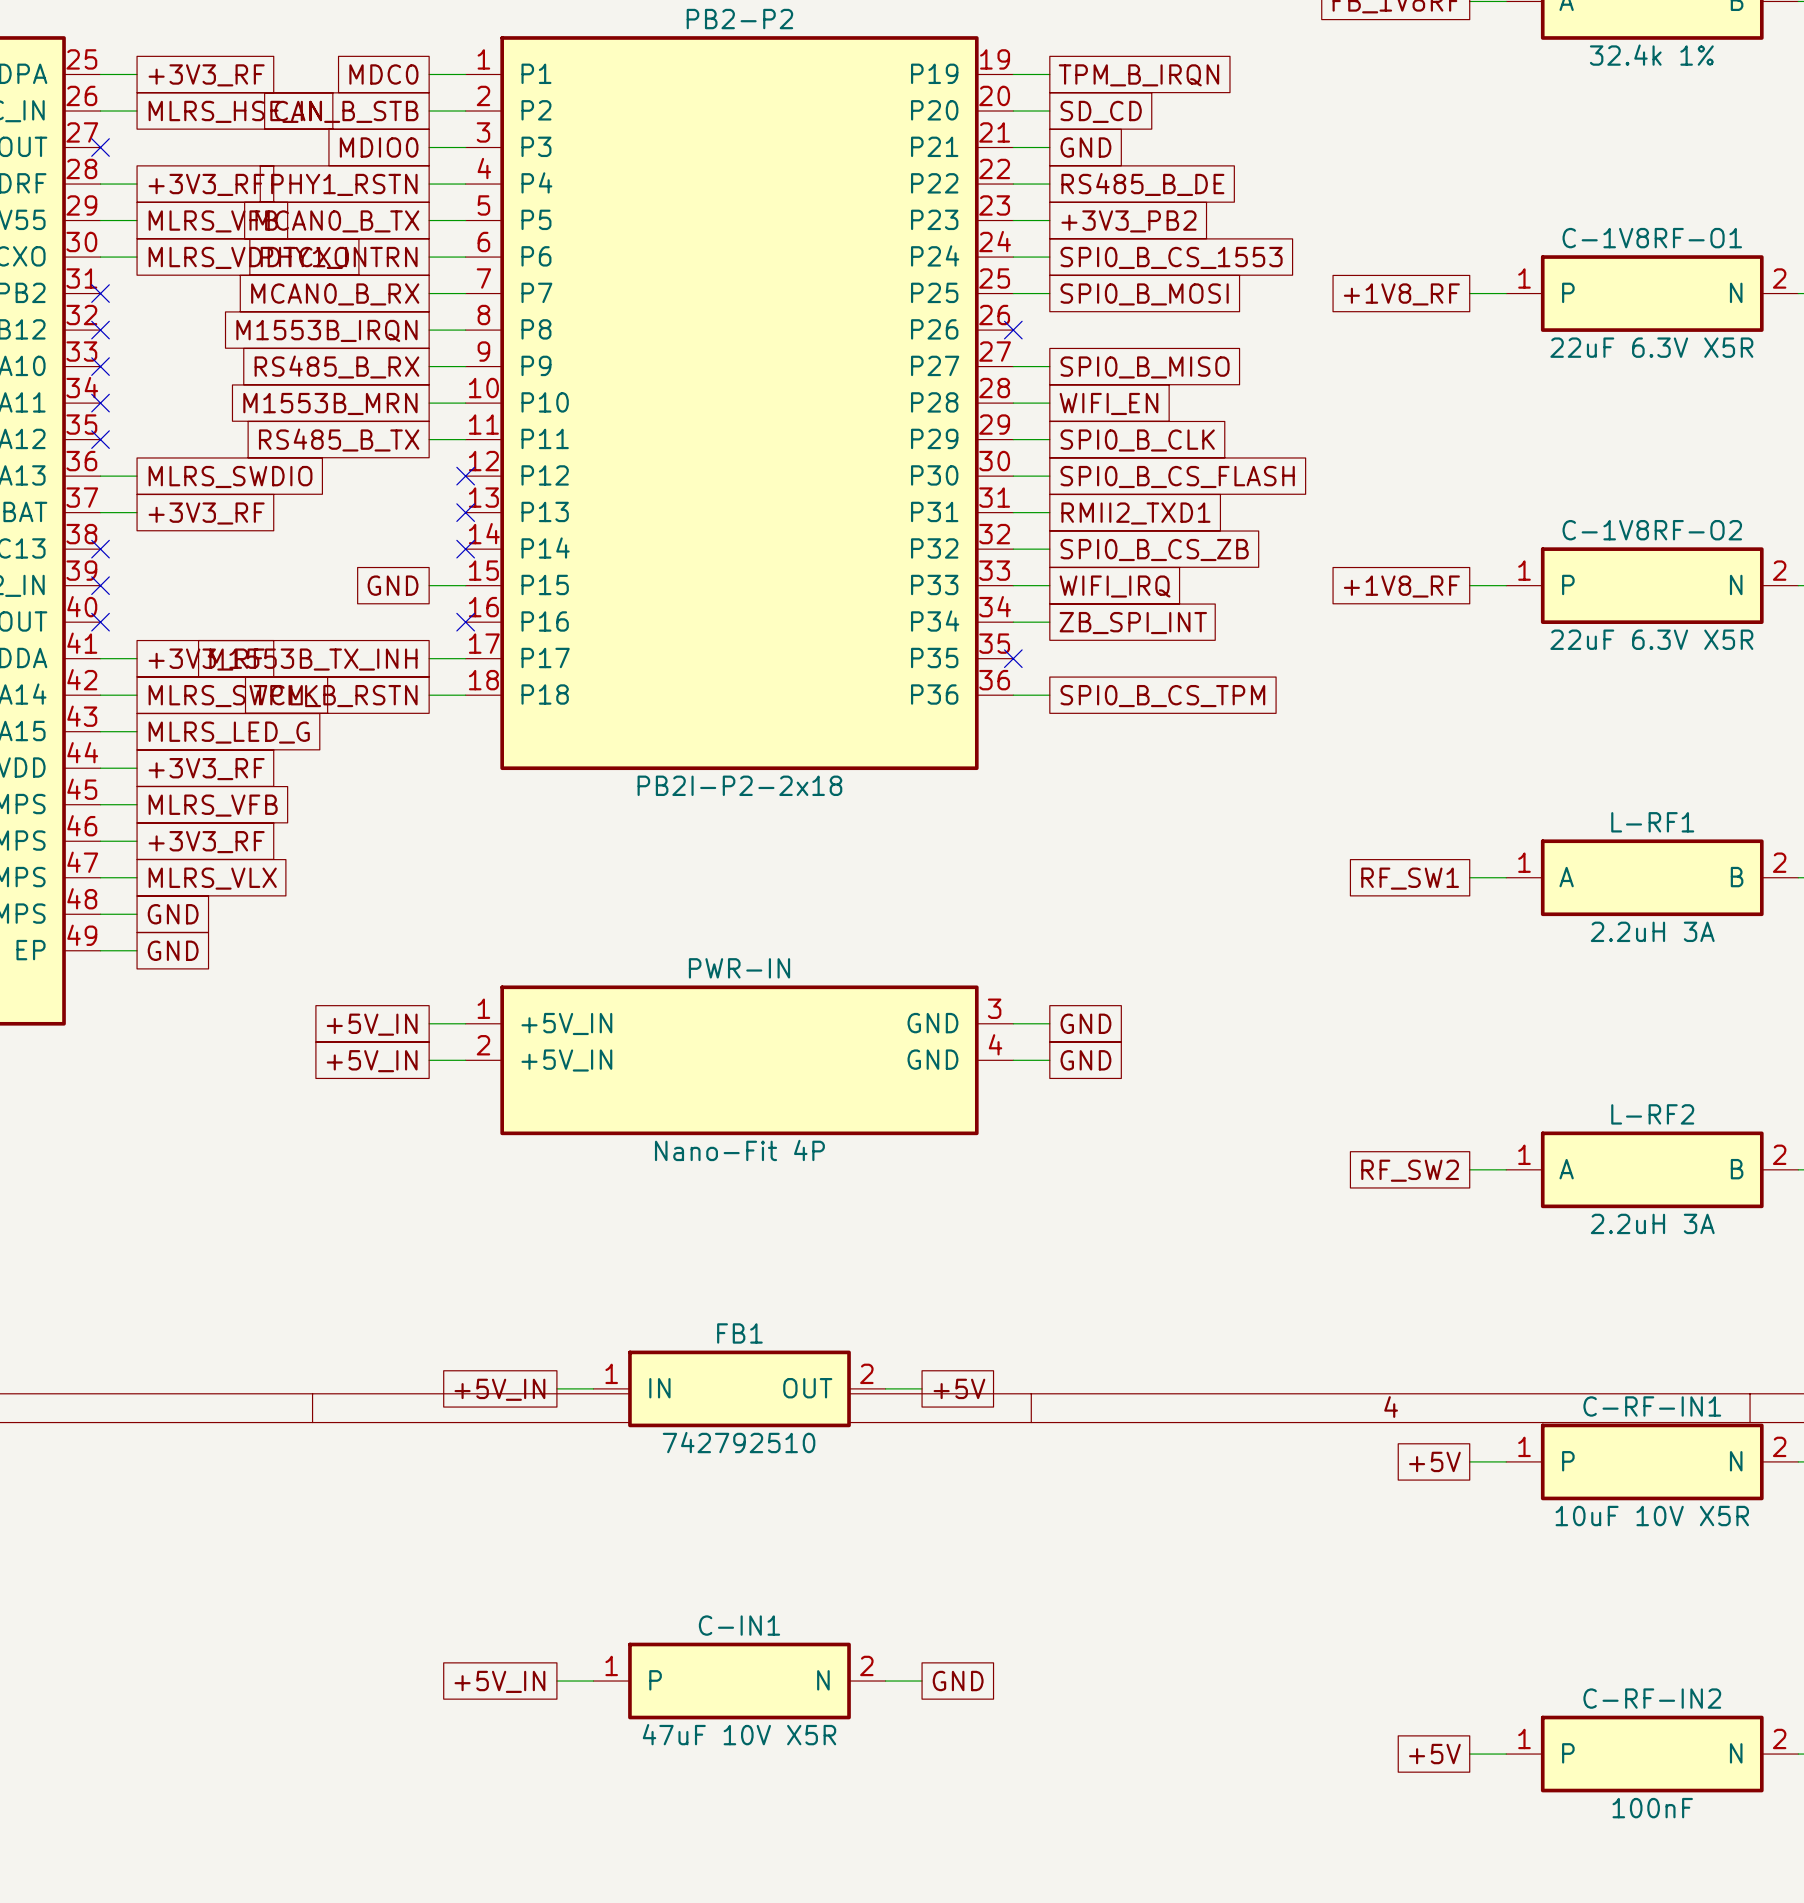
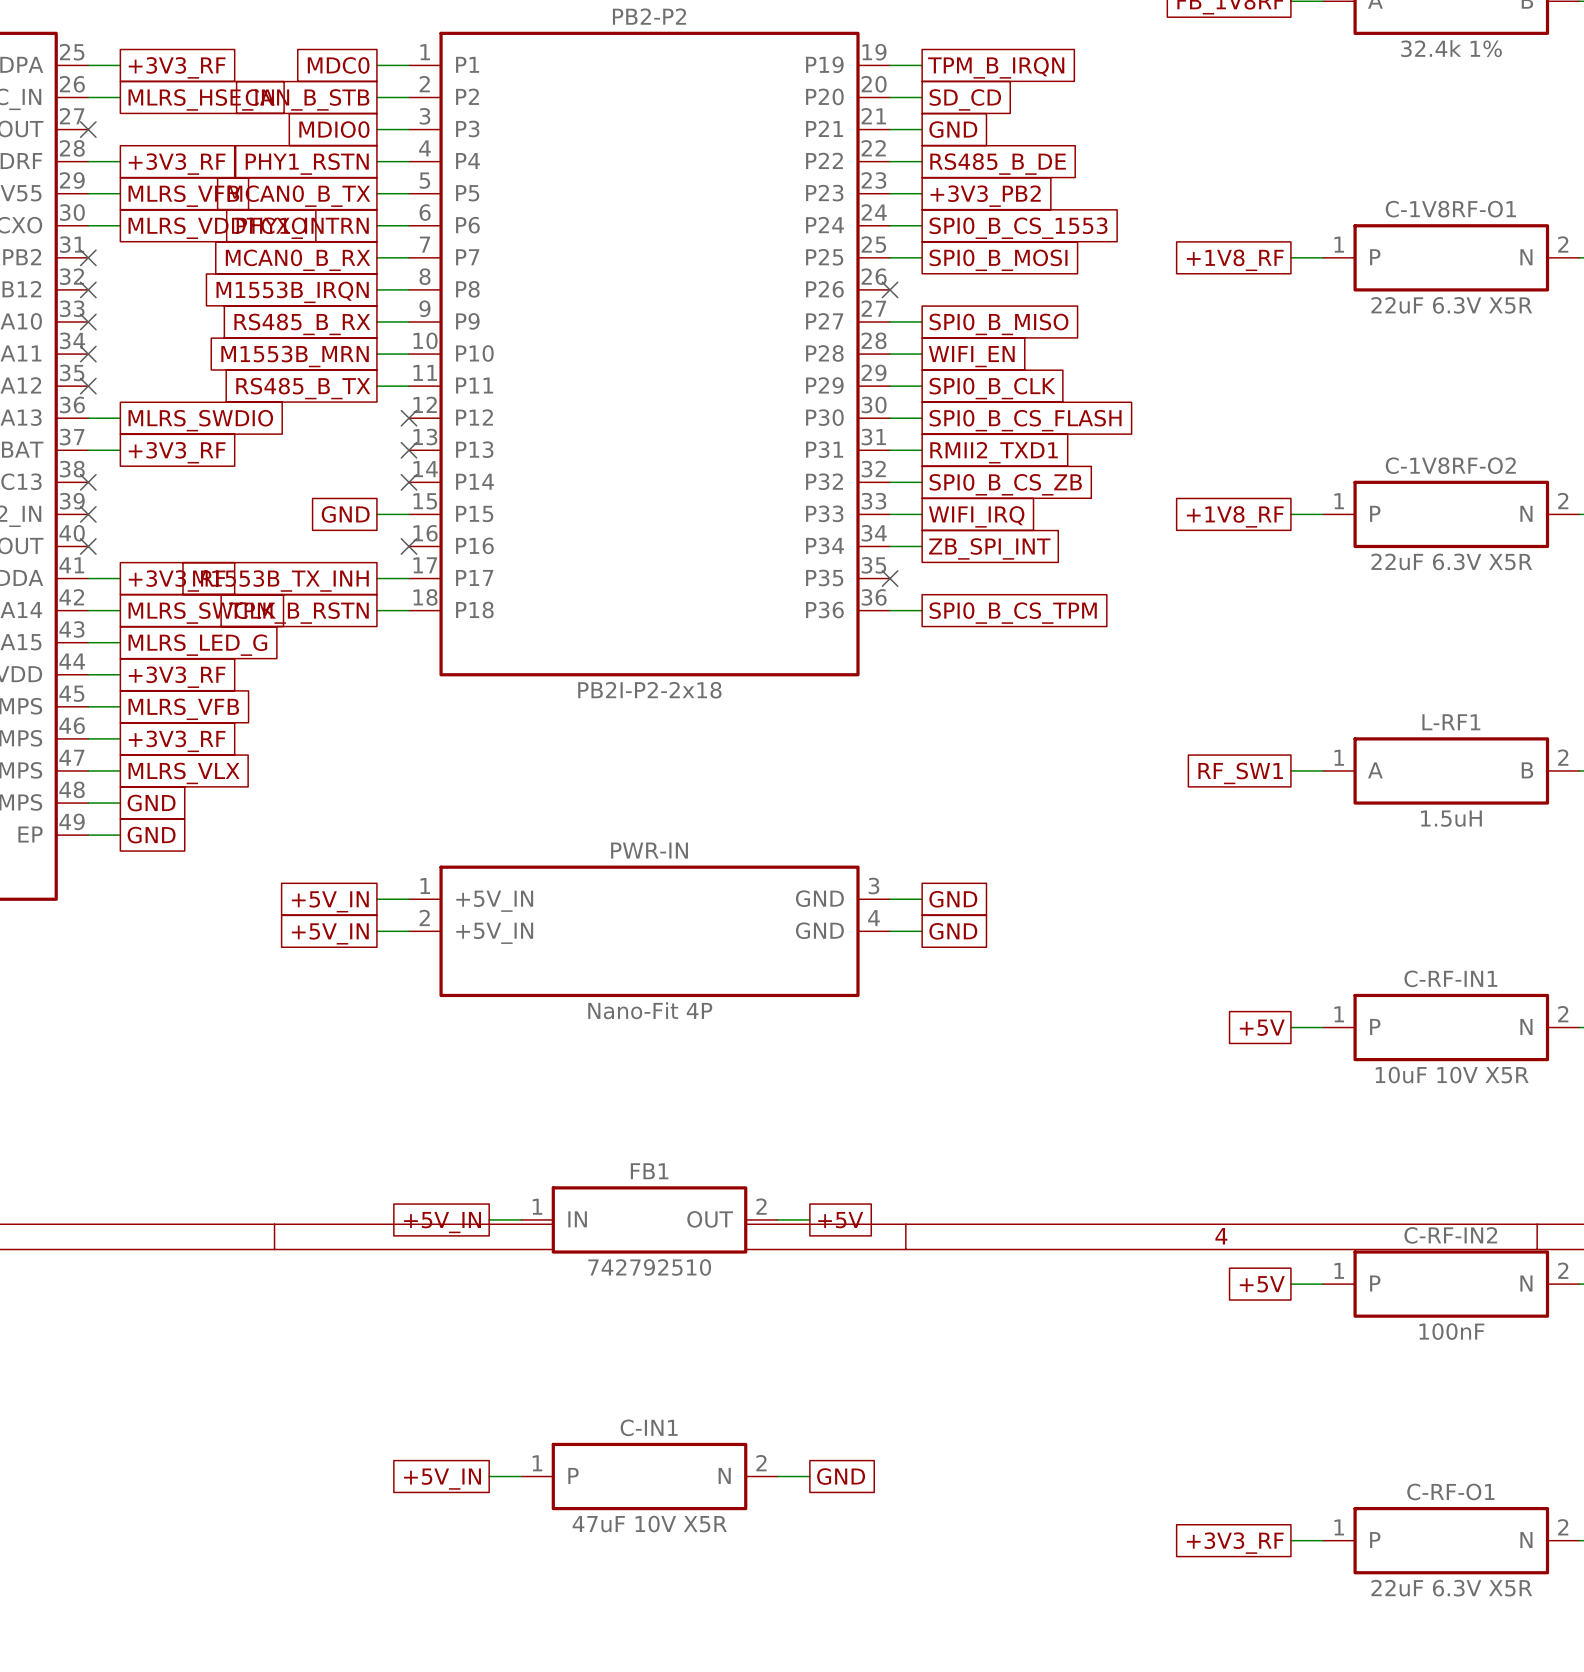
L-RF1 value: 2.2uH 3A (1652, 931) -> 1.5uH (1451, 818)
L-RF2 name: L-RF2 (1652, 1114) -> C-RF-IN1 (1450, 978)
L-RF2 pin name: A (1566, 1169) -> P (1375, 1026)
L-RF2 pin name: B (1737, 1169) -> N (1526, 1026)
global label: RF_SW2 (1410, 1170) -> +5V (1262, 1027)
L-RF2 value: 2.2uH 3A (1652, 1223) -> 10uF 10V X5R (1452, 1075)
C-RF-IN1 name: C-RF-IN1 (1652, 1406) -> C-RF-IN2 (1450, 1235)
C-RF-IN1 value: 10uF 10V X5R (1652, 1516) -> 100nF (1451, 1331)
C-RF-IN2 name: C-RF-IN2 (1652, 1698) -> C-RF-O1 (1450, 1491)
global label: +5V (1434, 1754) -> +3V3_RF (1235, 1543)
C-RF-IN2 value: 100nF (1652, 1808) -> 22uF 6.3V X5R (1451, 1588)

